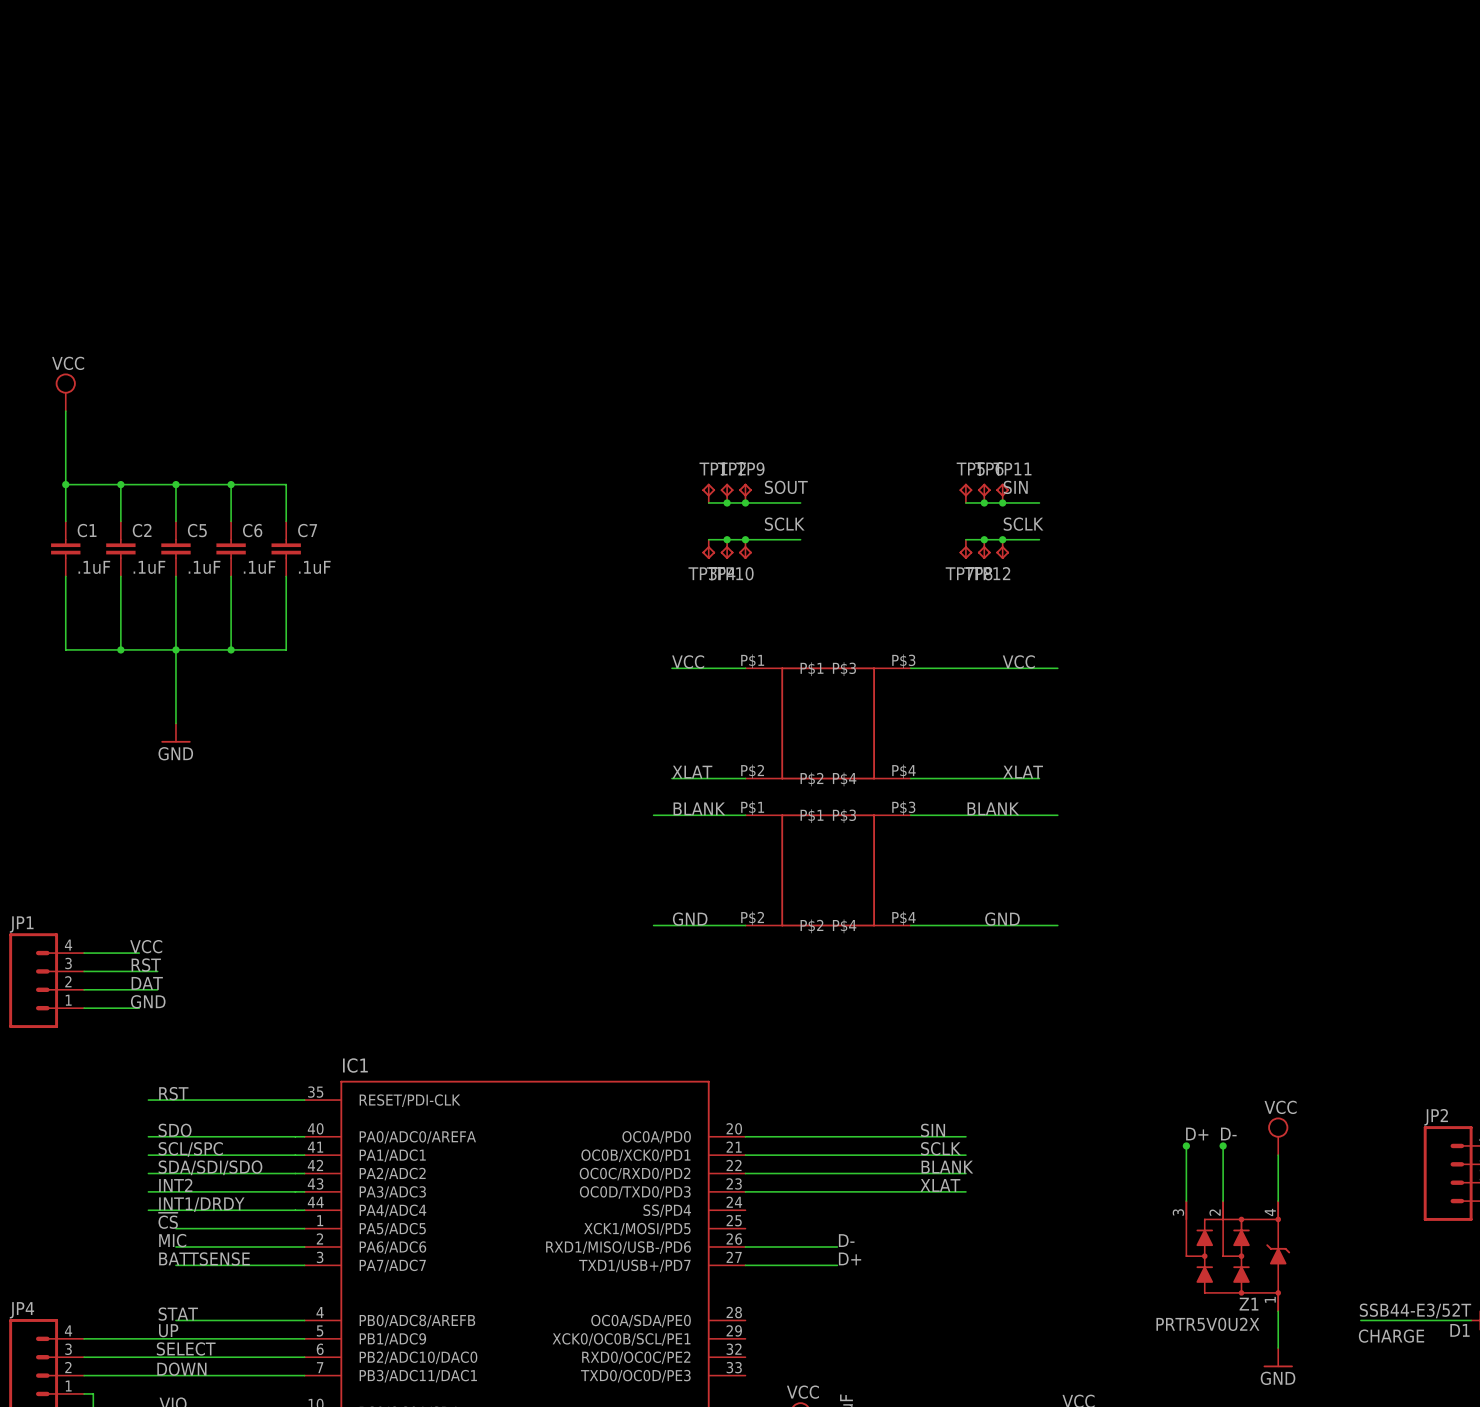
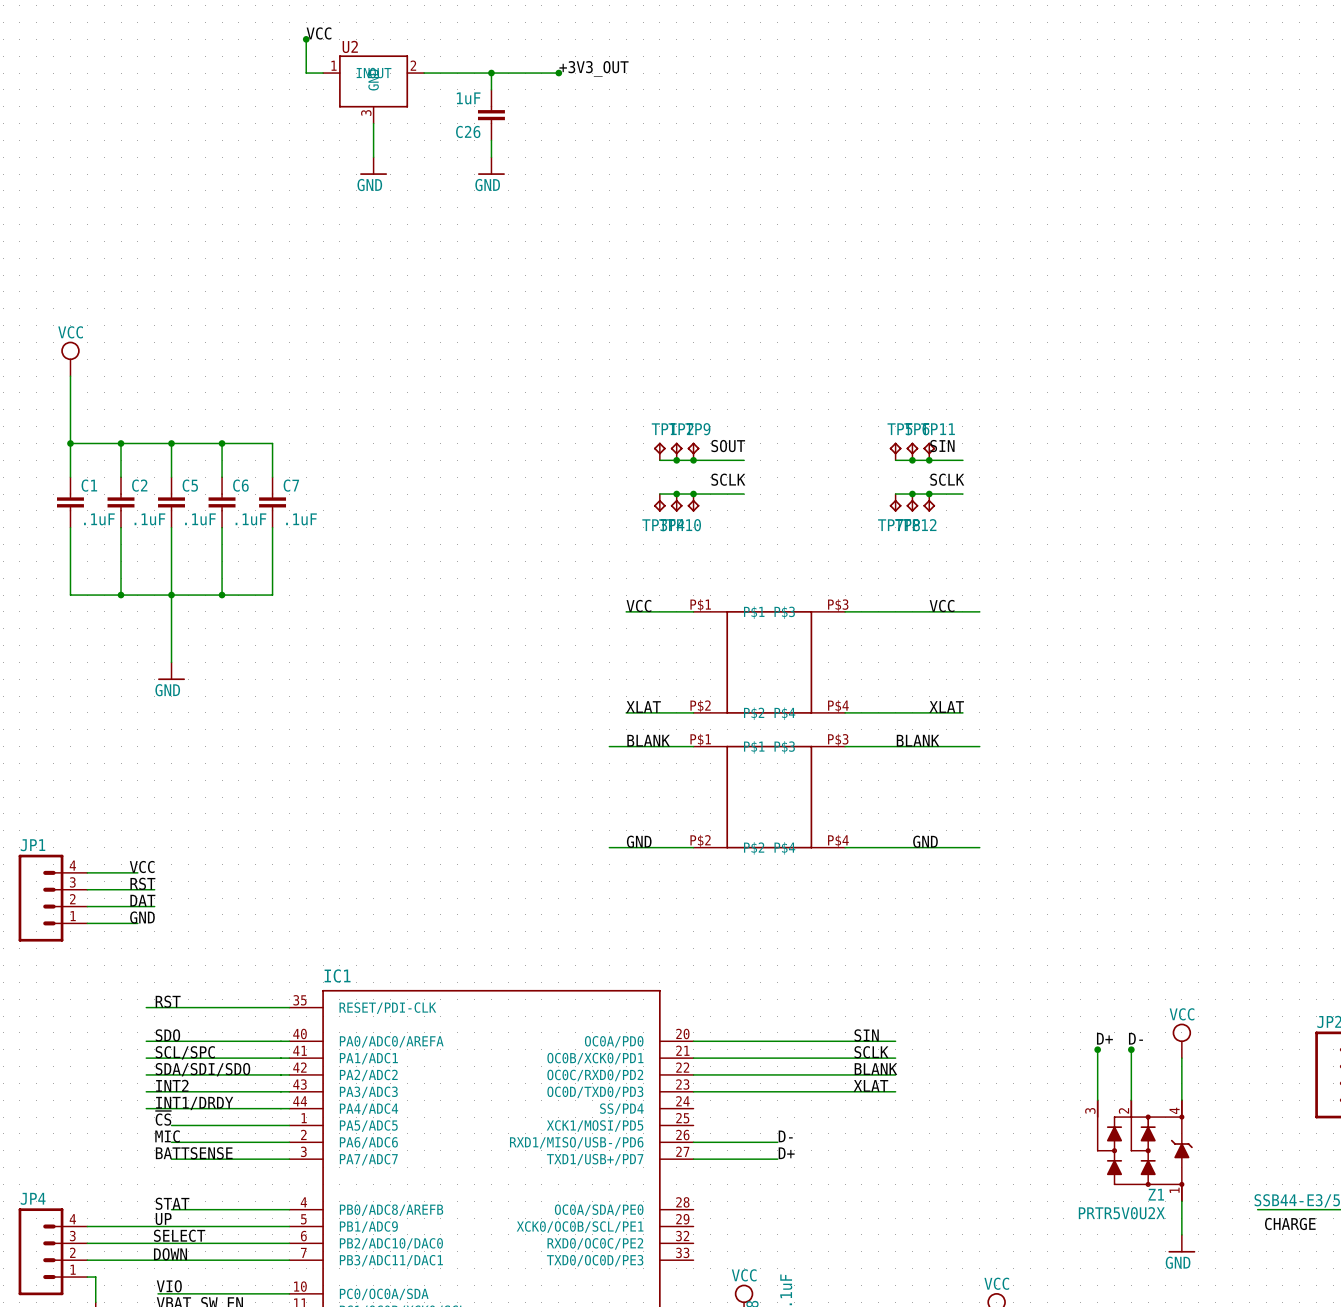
label: none -> VCC (319, 33)
wire: none -> (306, 39) (306, 73) (323, 73)
junction: none -> (306, 39)
label: none -> +3V3_OUT (594, 68)
wire: none -> (424, 73) (558, 73)
wire: none -> (491, 73) (491, 89)
junction: none -> (491, 73)
junction: none -> (558, 73)
U2: none -> (373, 89)
C26: none -> 1uF (491, 115)
wire: none -> (373, 123) (373, 157)
wire: none -> (491, 140) (491, 157)
power symbol: none -> GND (373, 166)
power symbol: none -> GND (491, 166)

